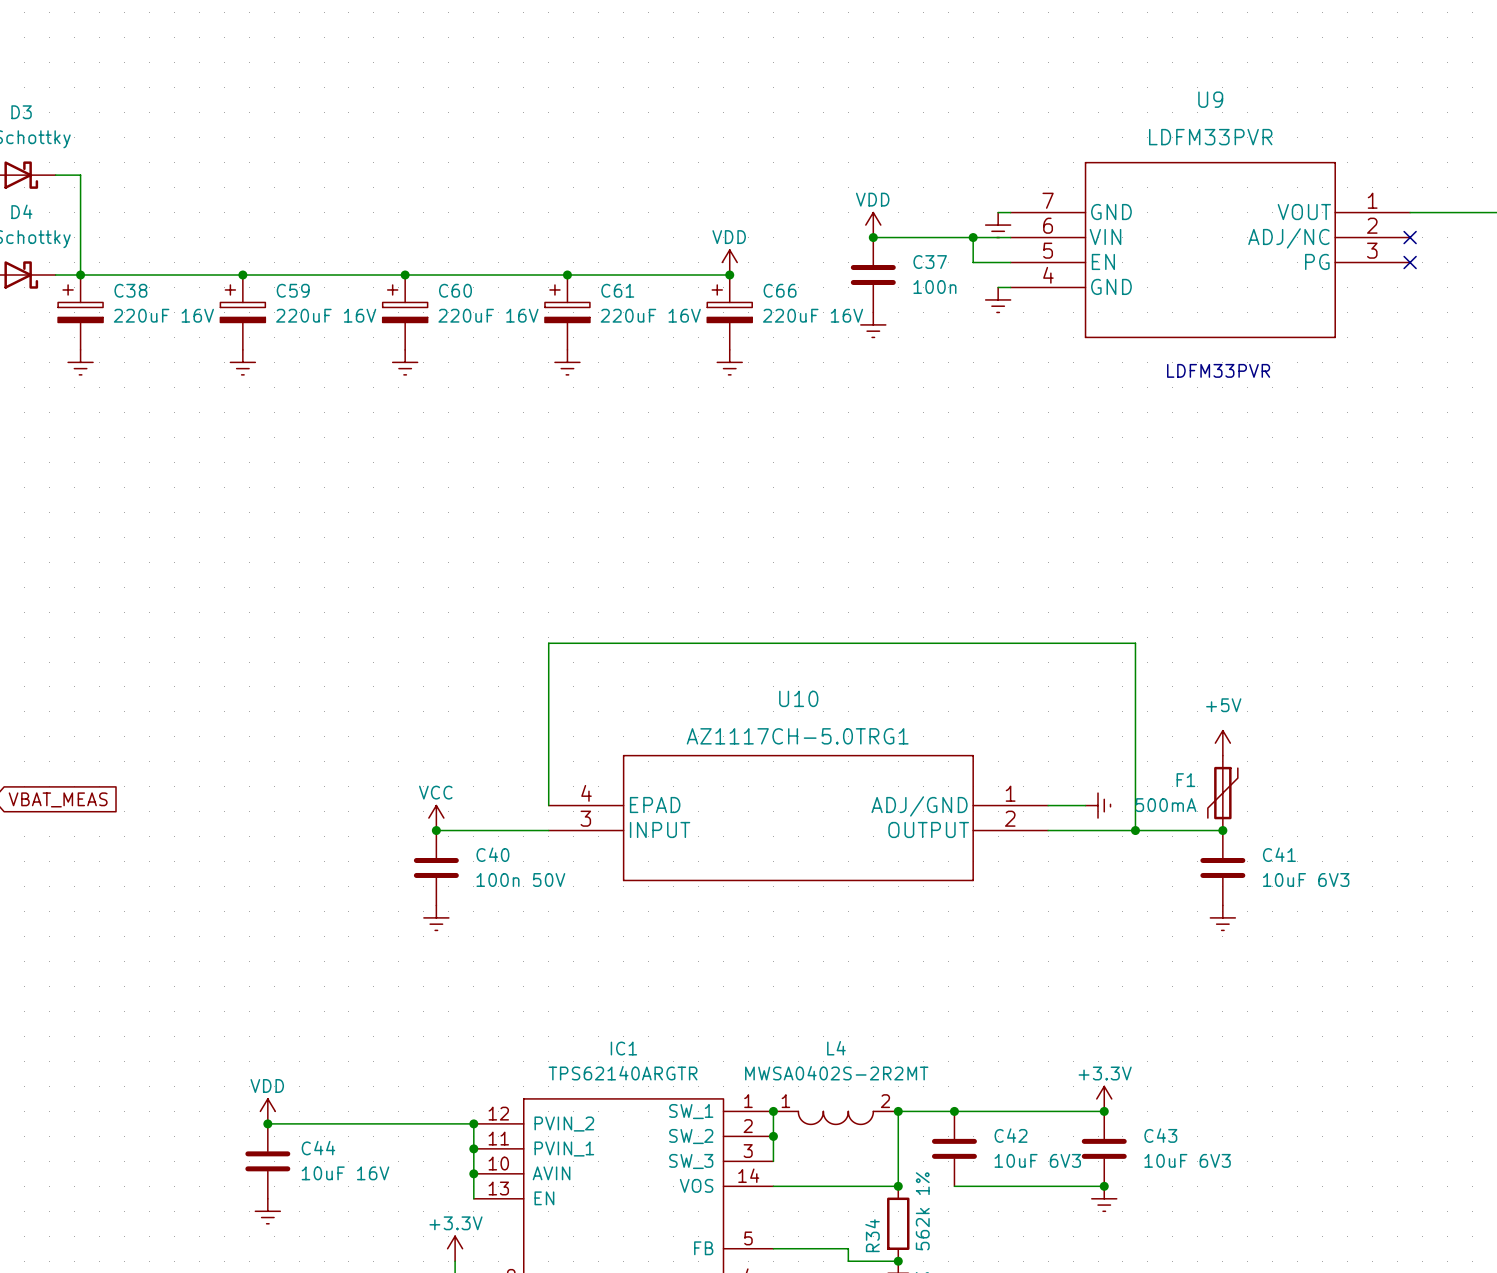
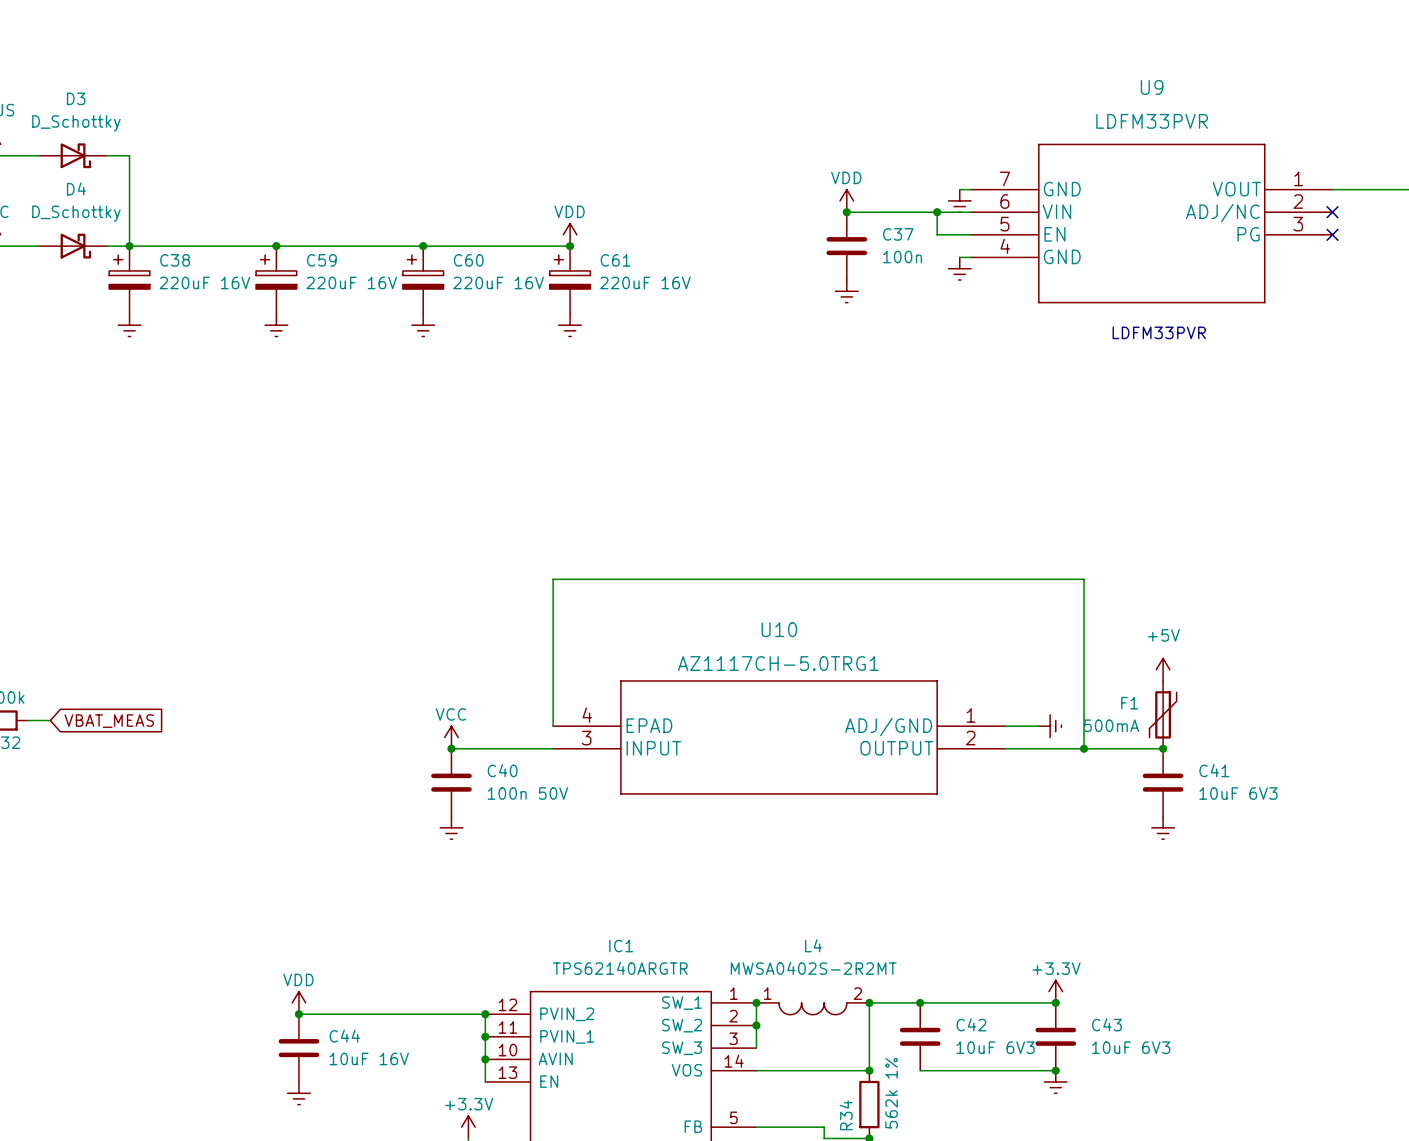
power symbol position: VDD (729, 262) -> VDD (570, 234)
wire: (567, 274) (729, 274) -> none
junction: (729, 274) -> none
C66: 220uF 16V (729, 312) -> none
power symbol: (729, 362) -> none

